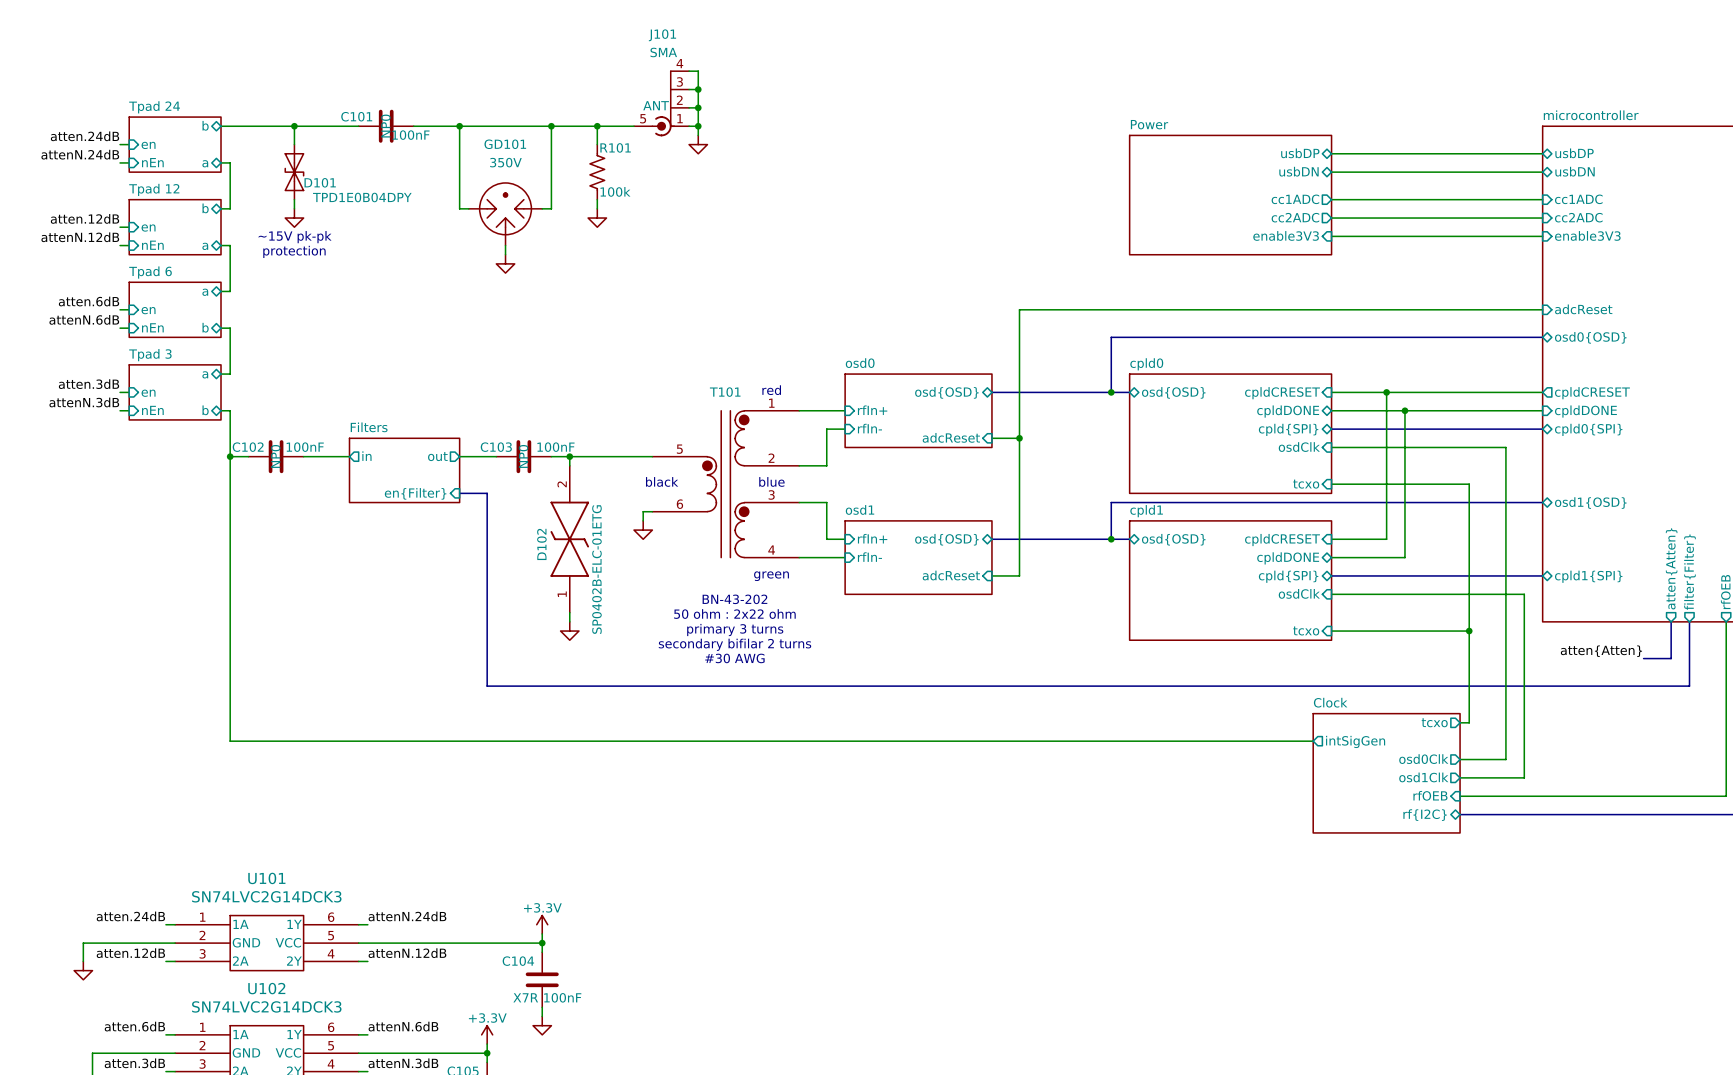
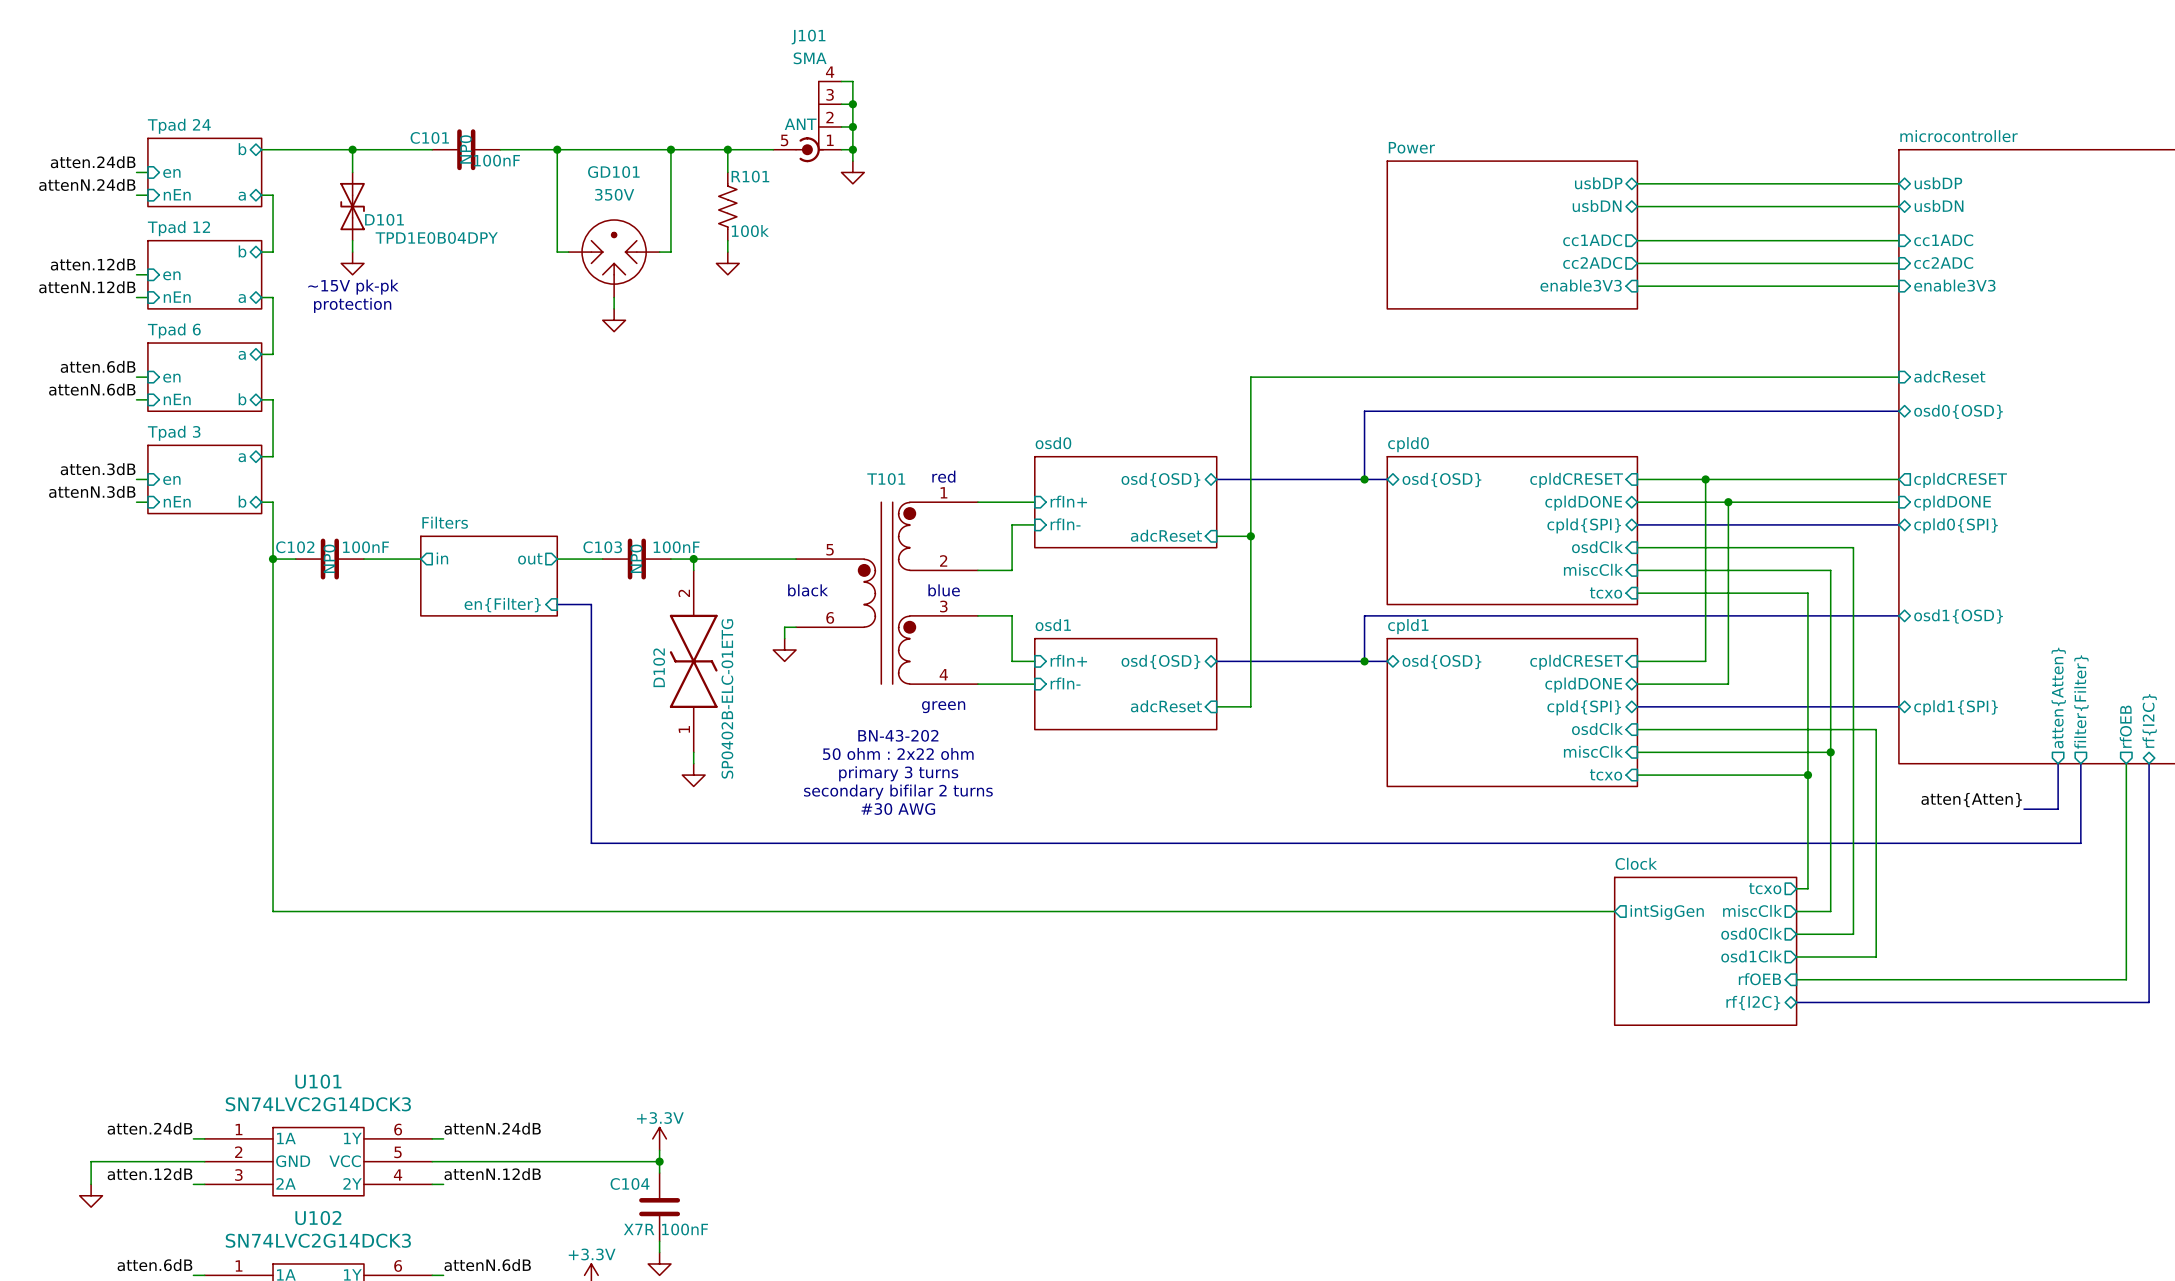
sheet pin: none -> miscClk (1593, 569)
wire: none -> (1637, 570) (1830, 570) (1830, 911) (1796, 911)
sheet pin: none -> miscClk (1593, 751)
wire: none -> (1637, 752) (1830, 752)
junction: none -> (1830, 752)
sheet pin: none -> miscClk (1752, 910)

